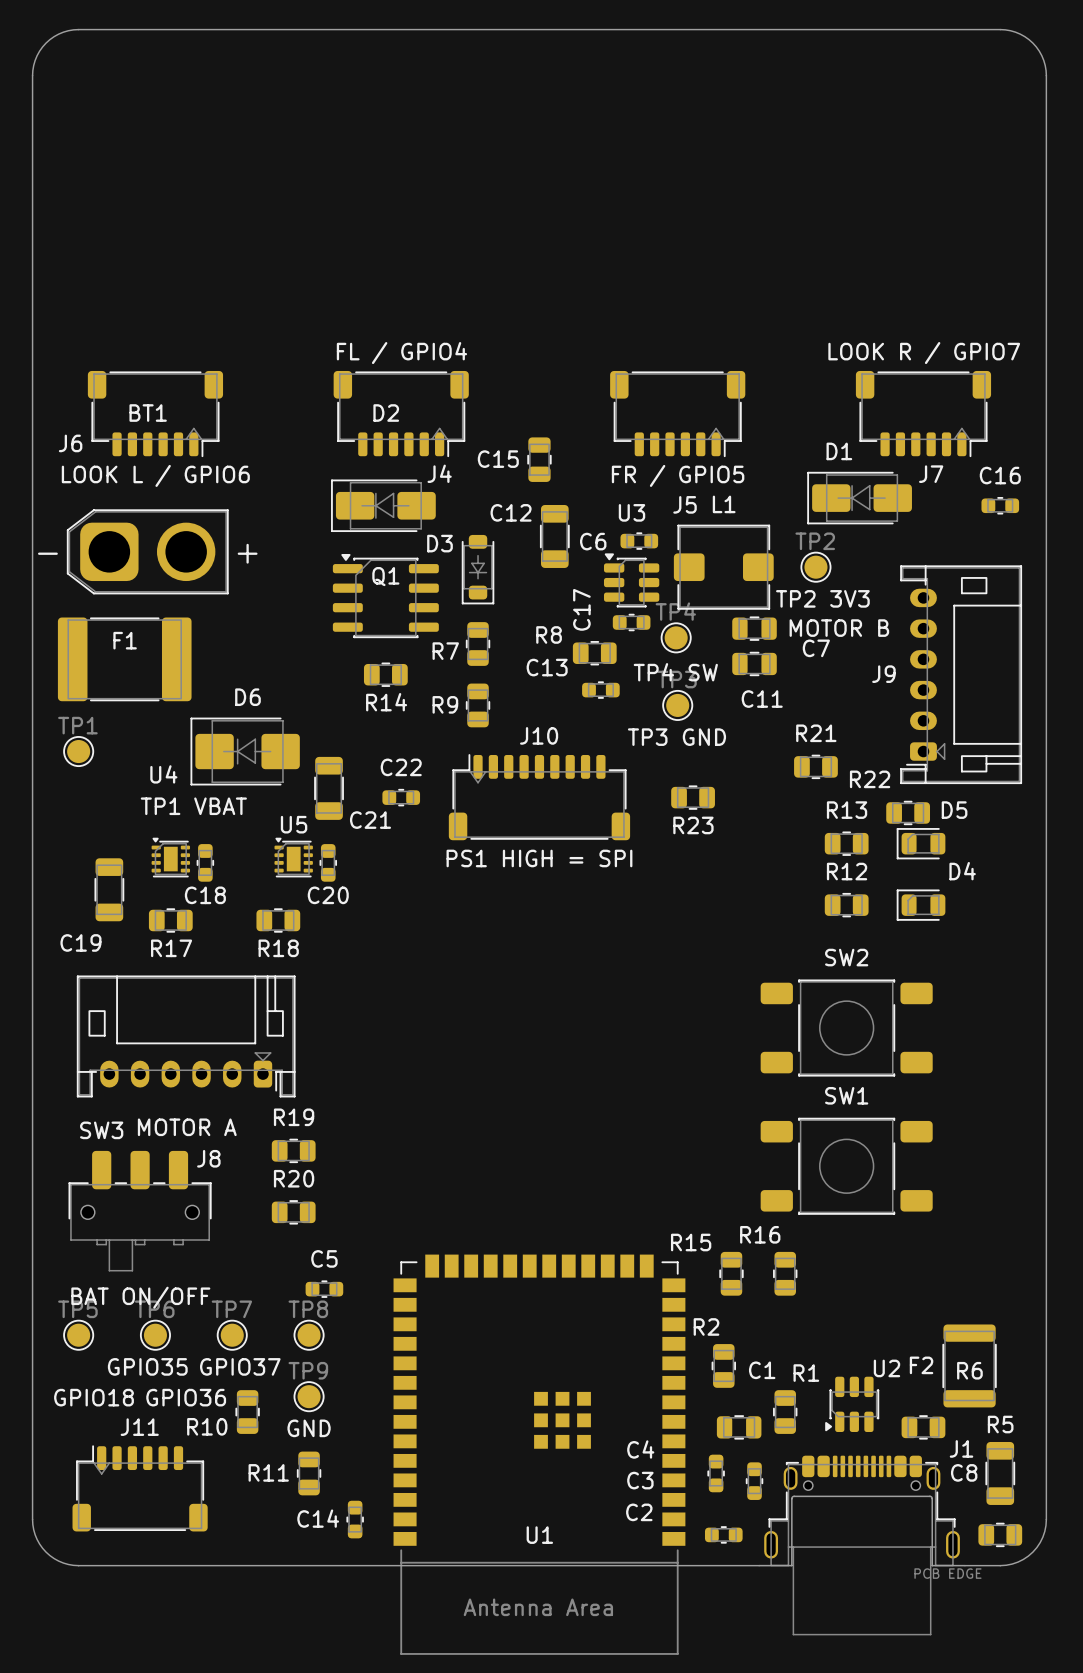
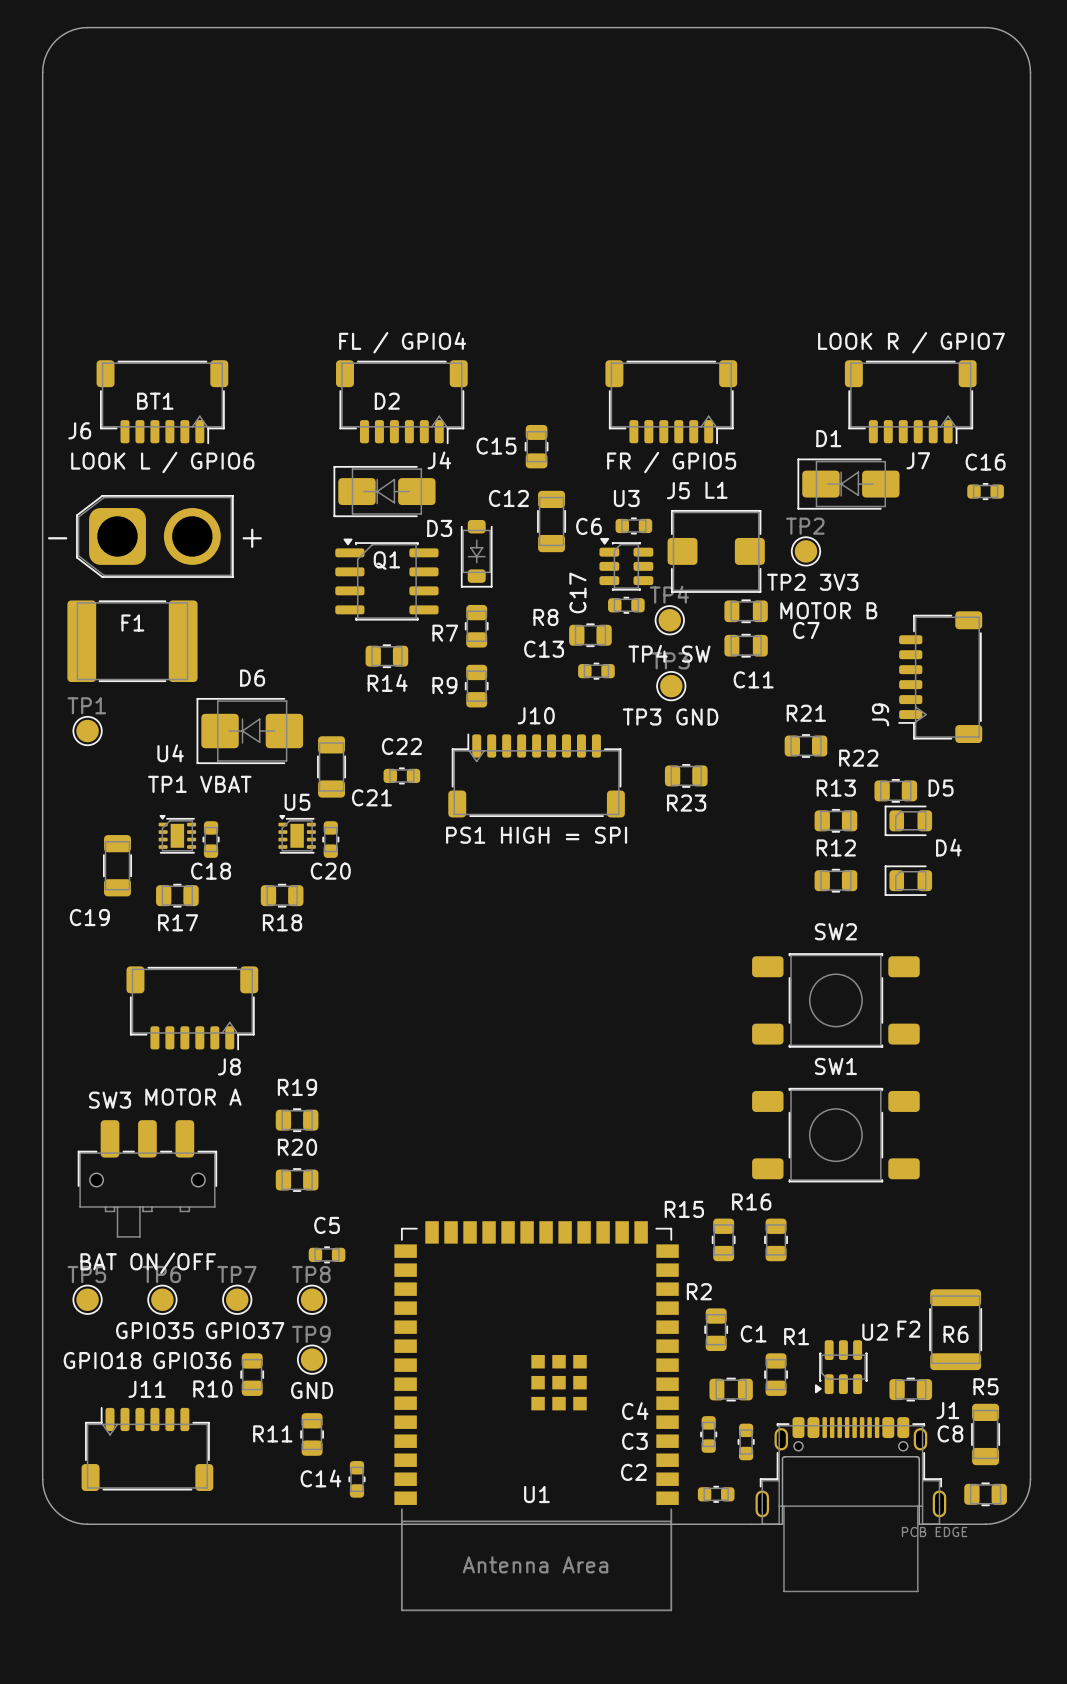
J9 footprint: [900, 565, 1023, 785] -> [898, 611, 983, 744]
J9 name position: J9 (883, 674) -> J9 (880, 714)
J8 footprint: [76, 975, 296, 1098] -> [126, 966, 259, 1051]
J8 name position: J8 (208, 1158) -> J8 (229, 1066)

